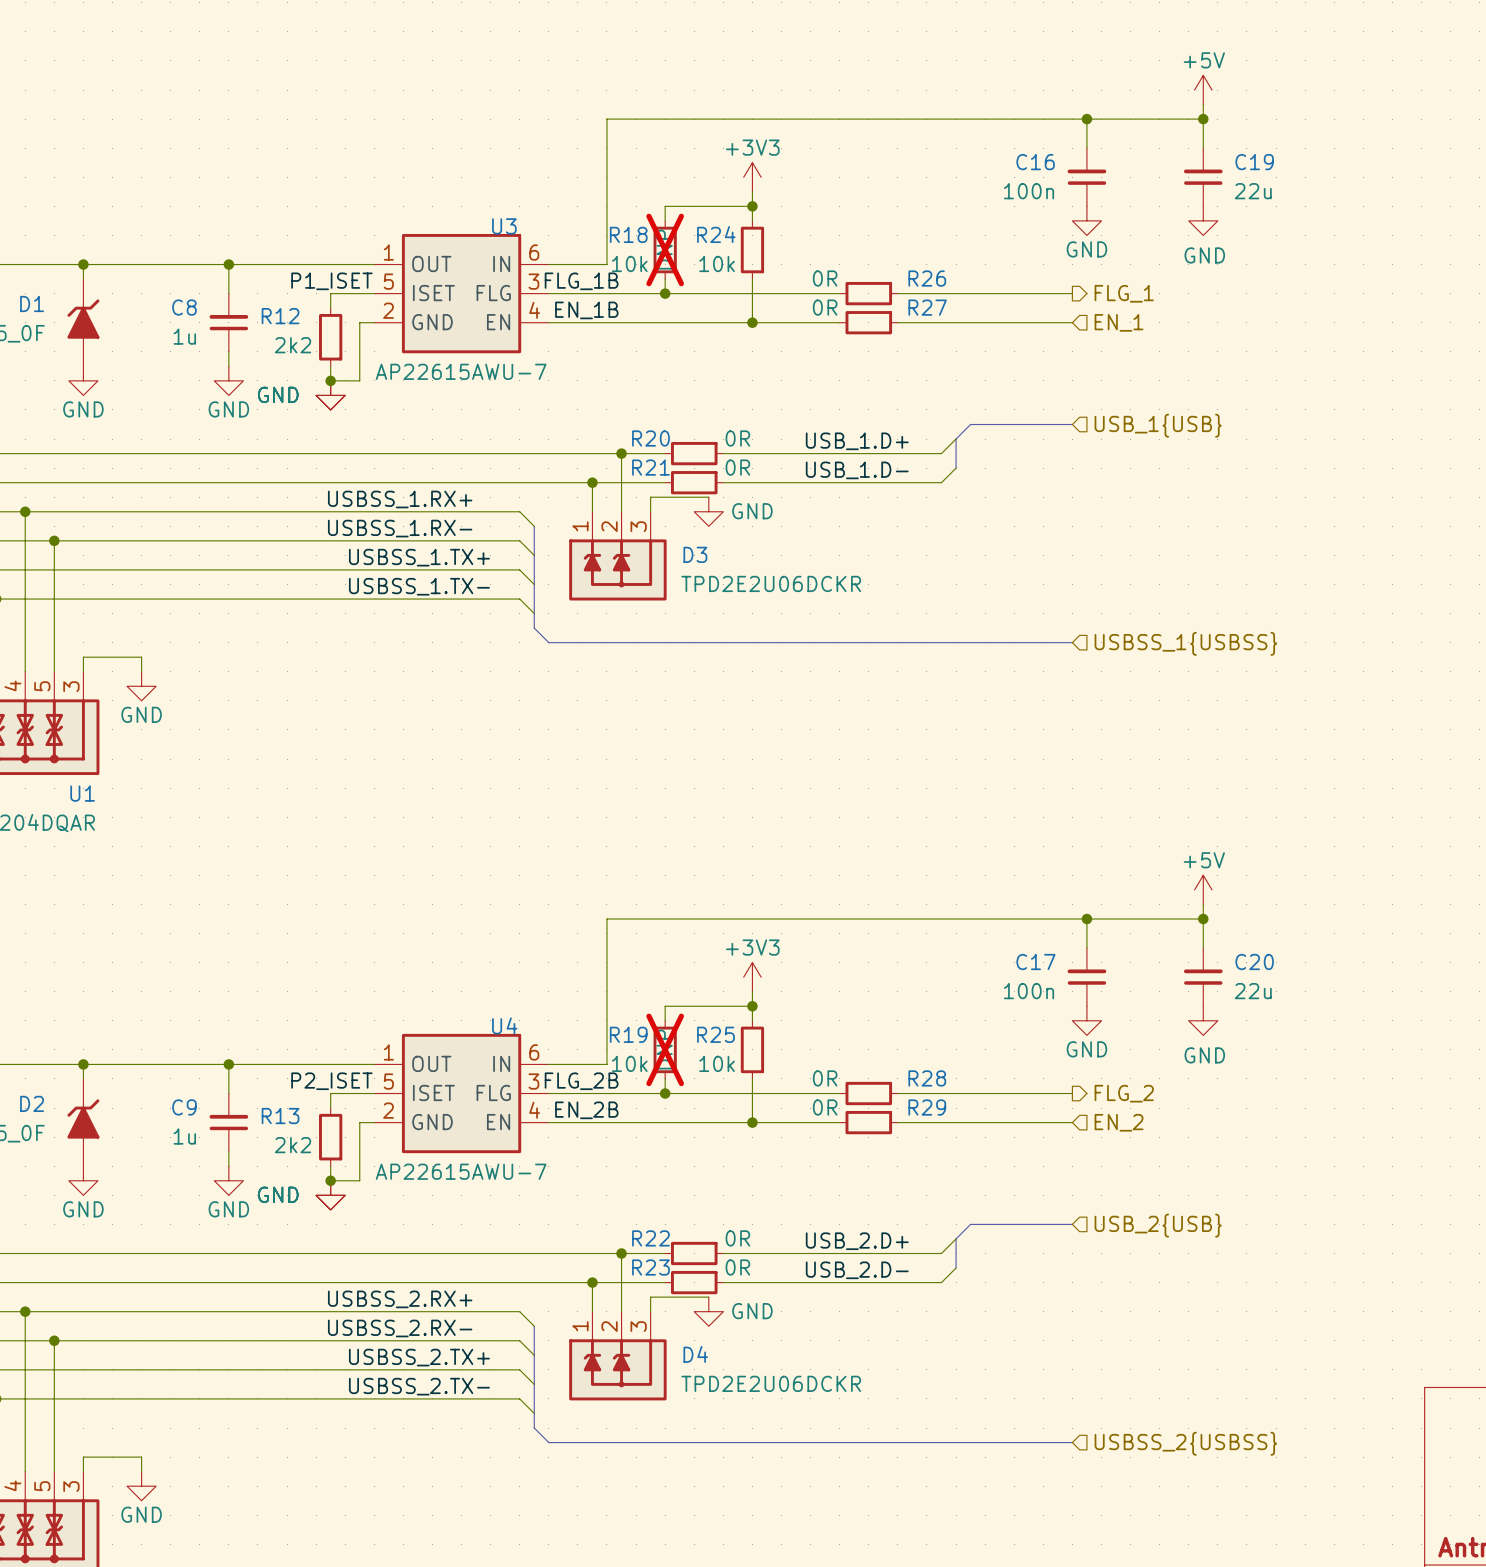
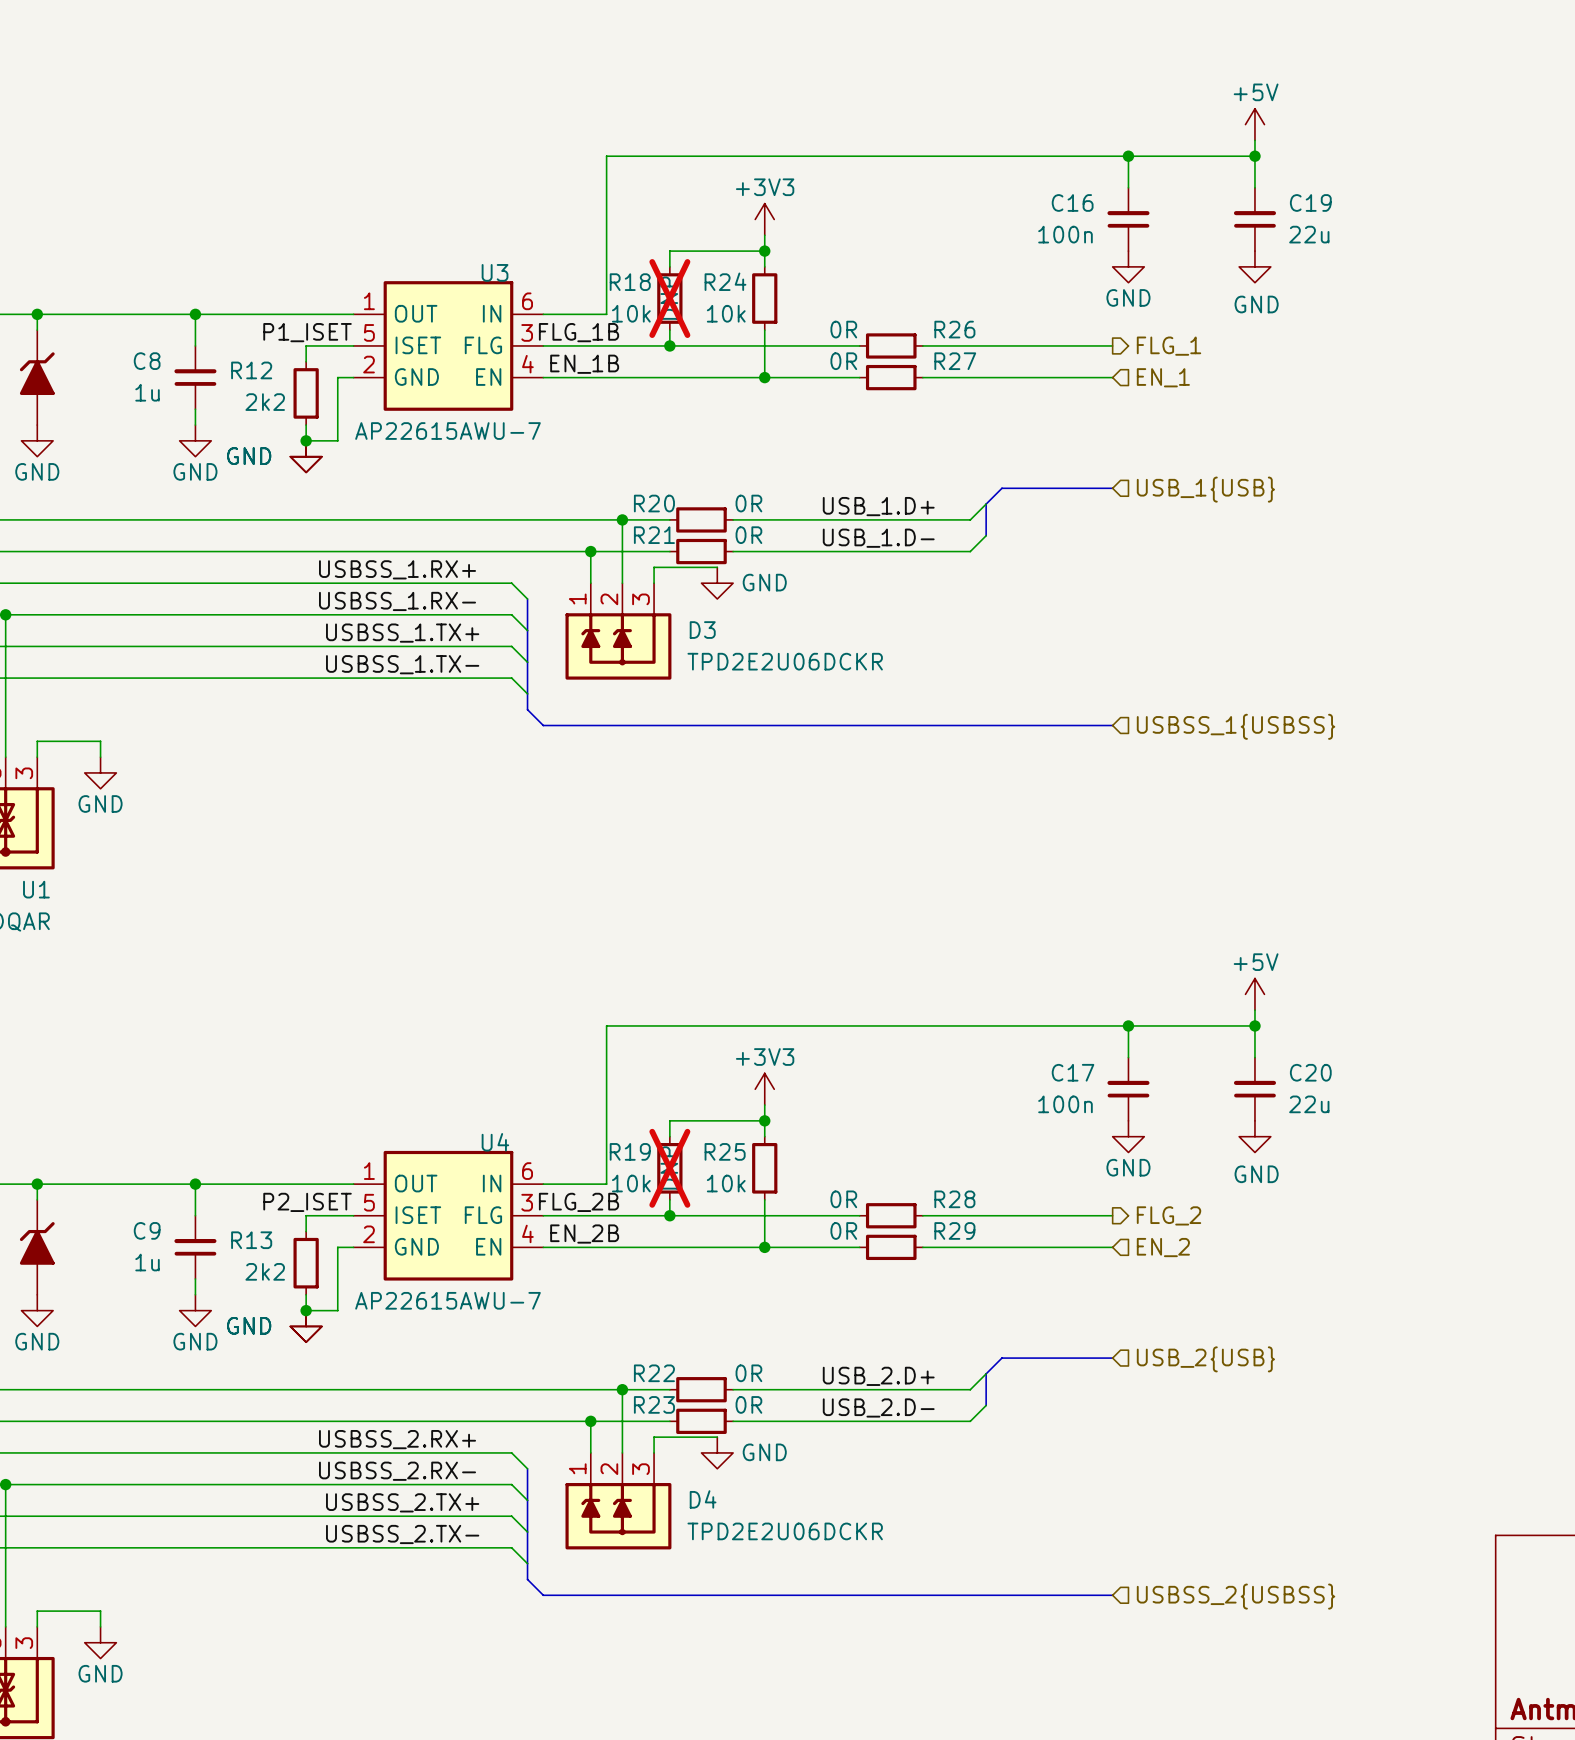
label position: USBSS_1.RX+ (400, 499) -> USBSS_1.RX+ (397, 569)
label position: USBSS_1.RX- (400, 528) -> USBSS_1.RX- (397, 601)
label position: USBSS_2.RX+ (400, 1299) -> USBSS_2.RX+ (397, 1439)
label position: USBSS_2.RX- (400, 1328) -> USBSS_2.RX- (397, 1471)

